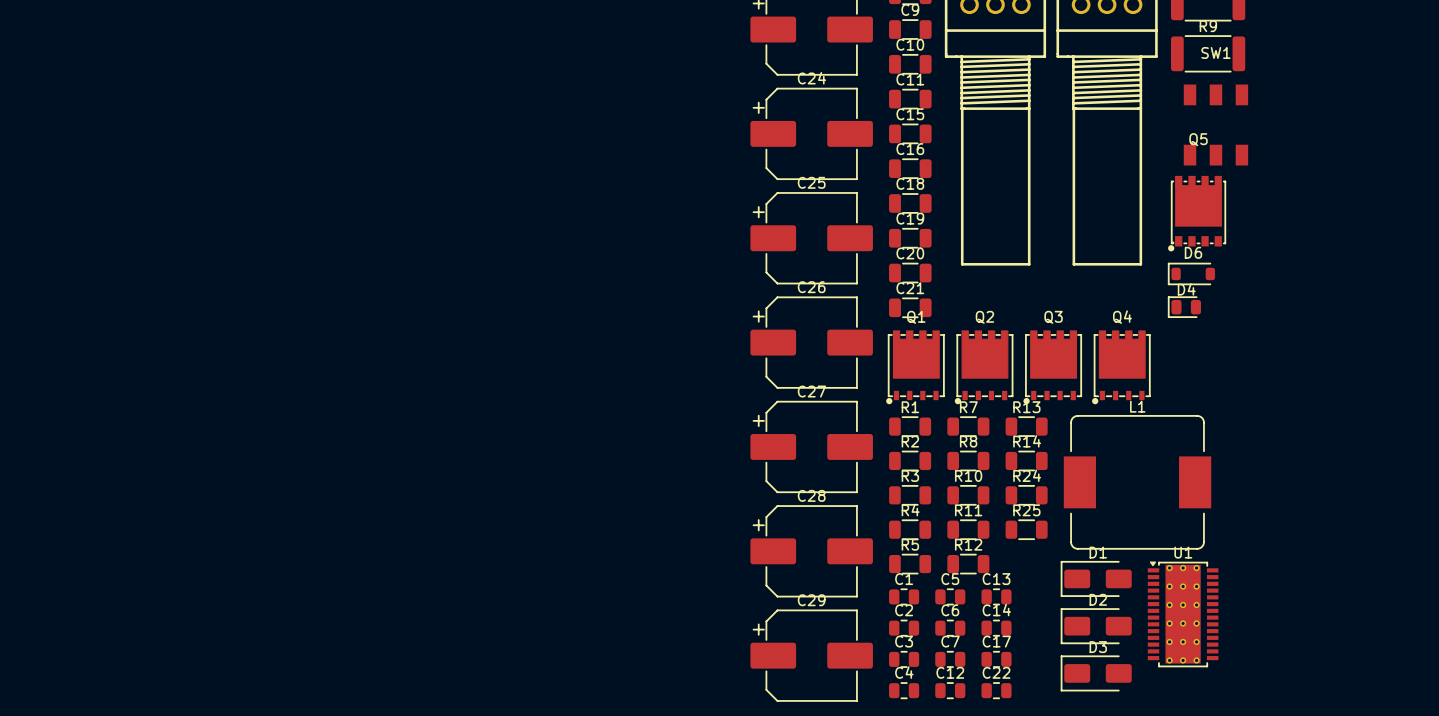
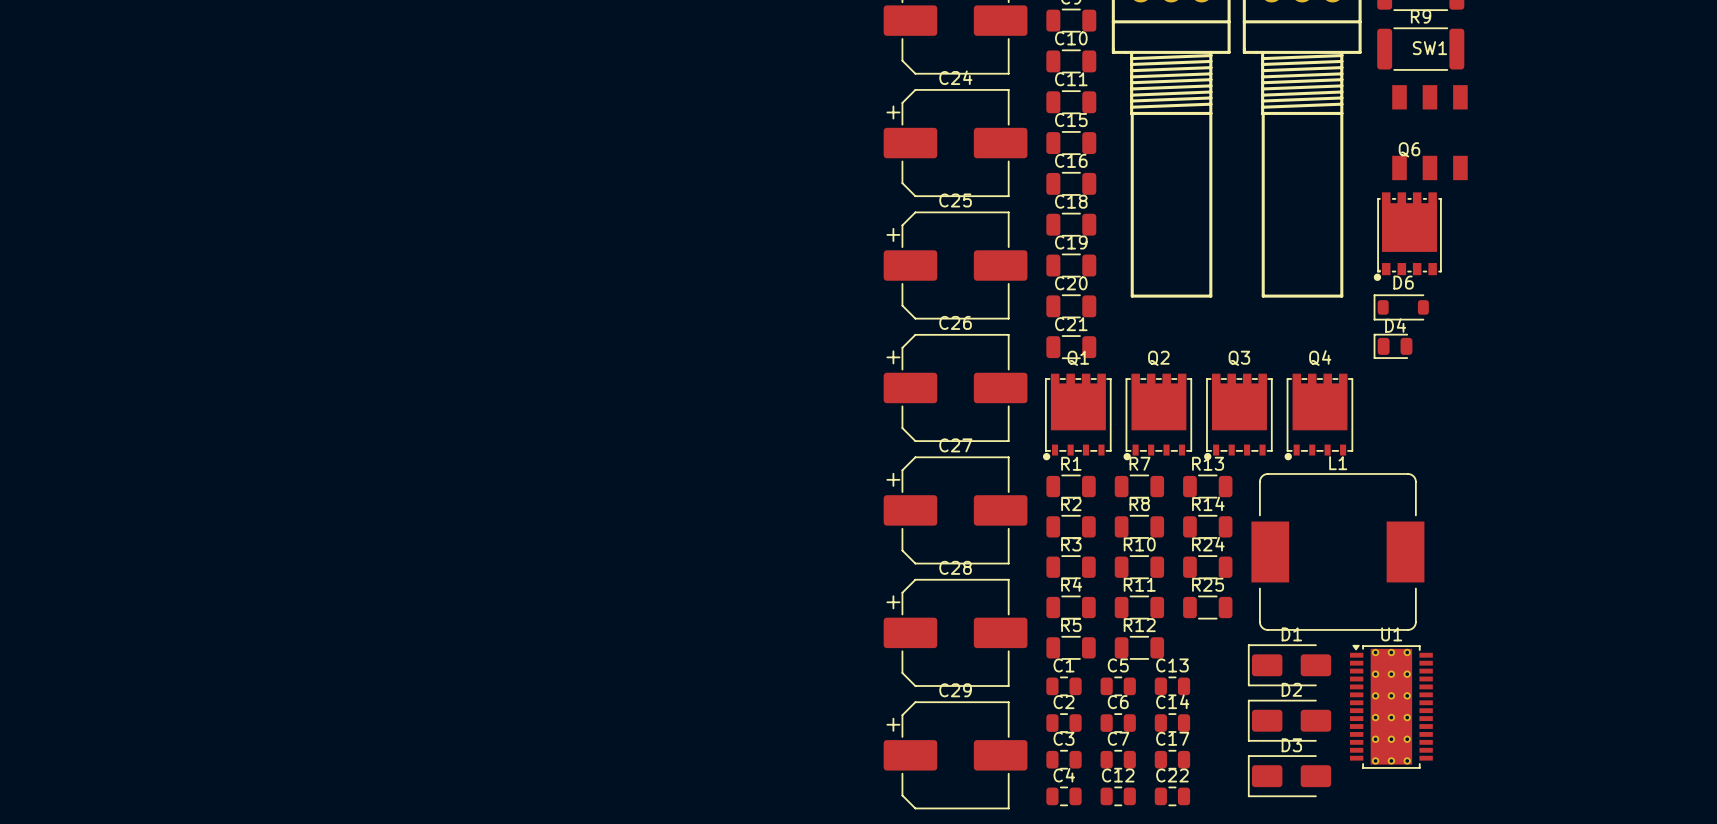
Q5 name: Q5 (1198, 139) -> Q6 (1409, 149)

